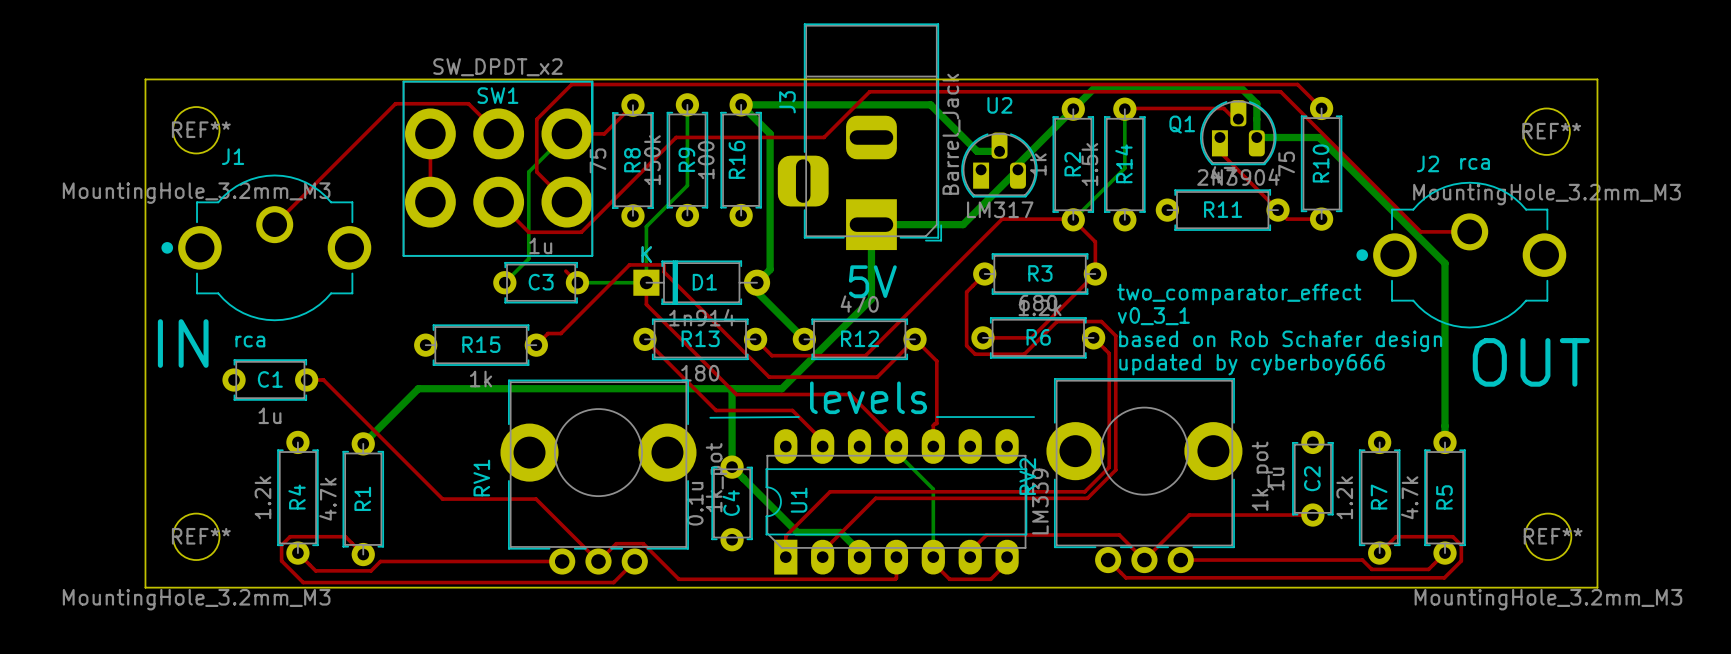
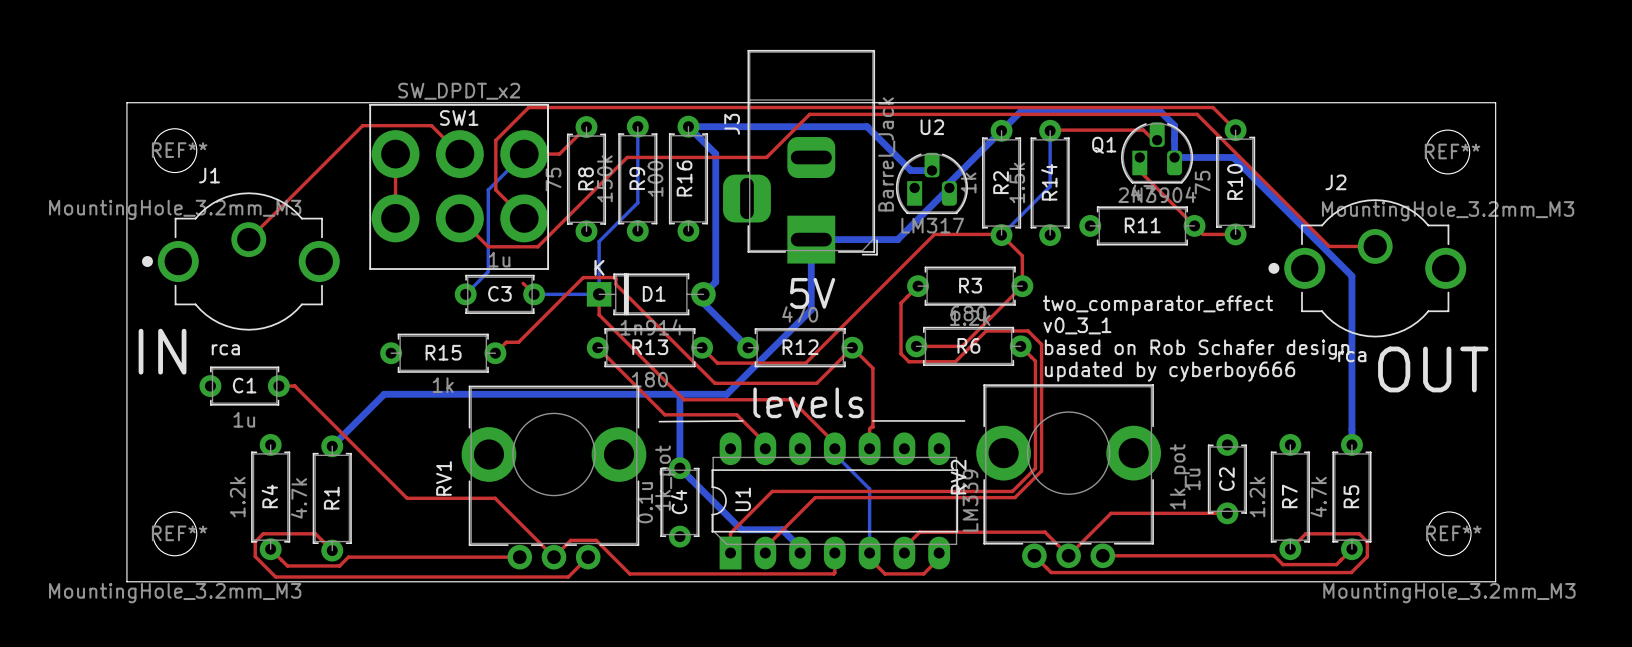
J2 value position: rca (1475, 163) -> rca (1352, 356)

